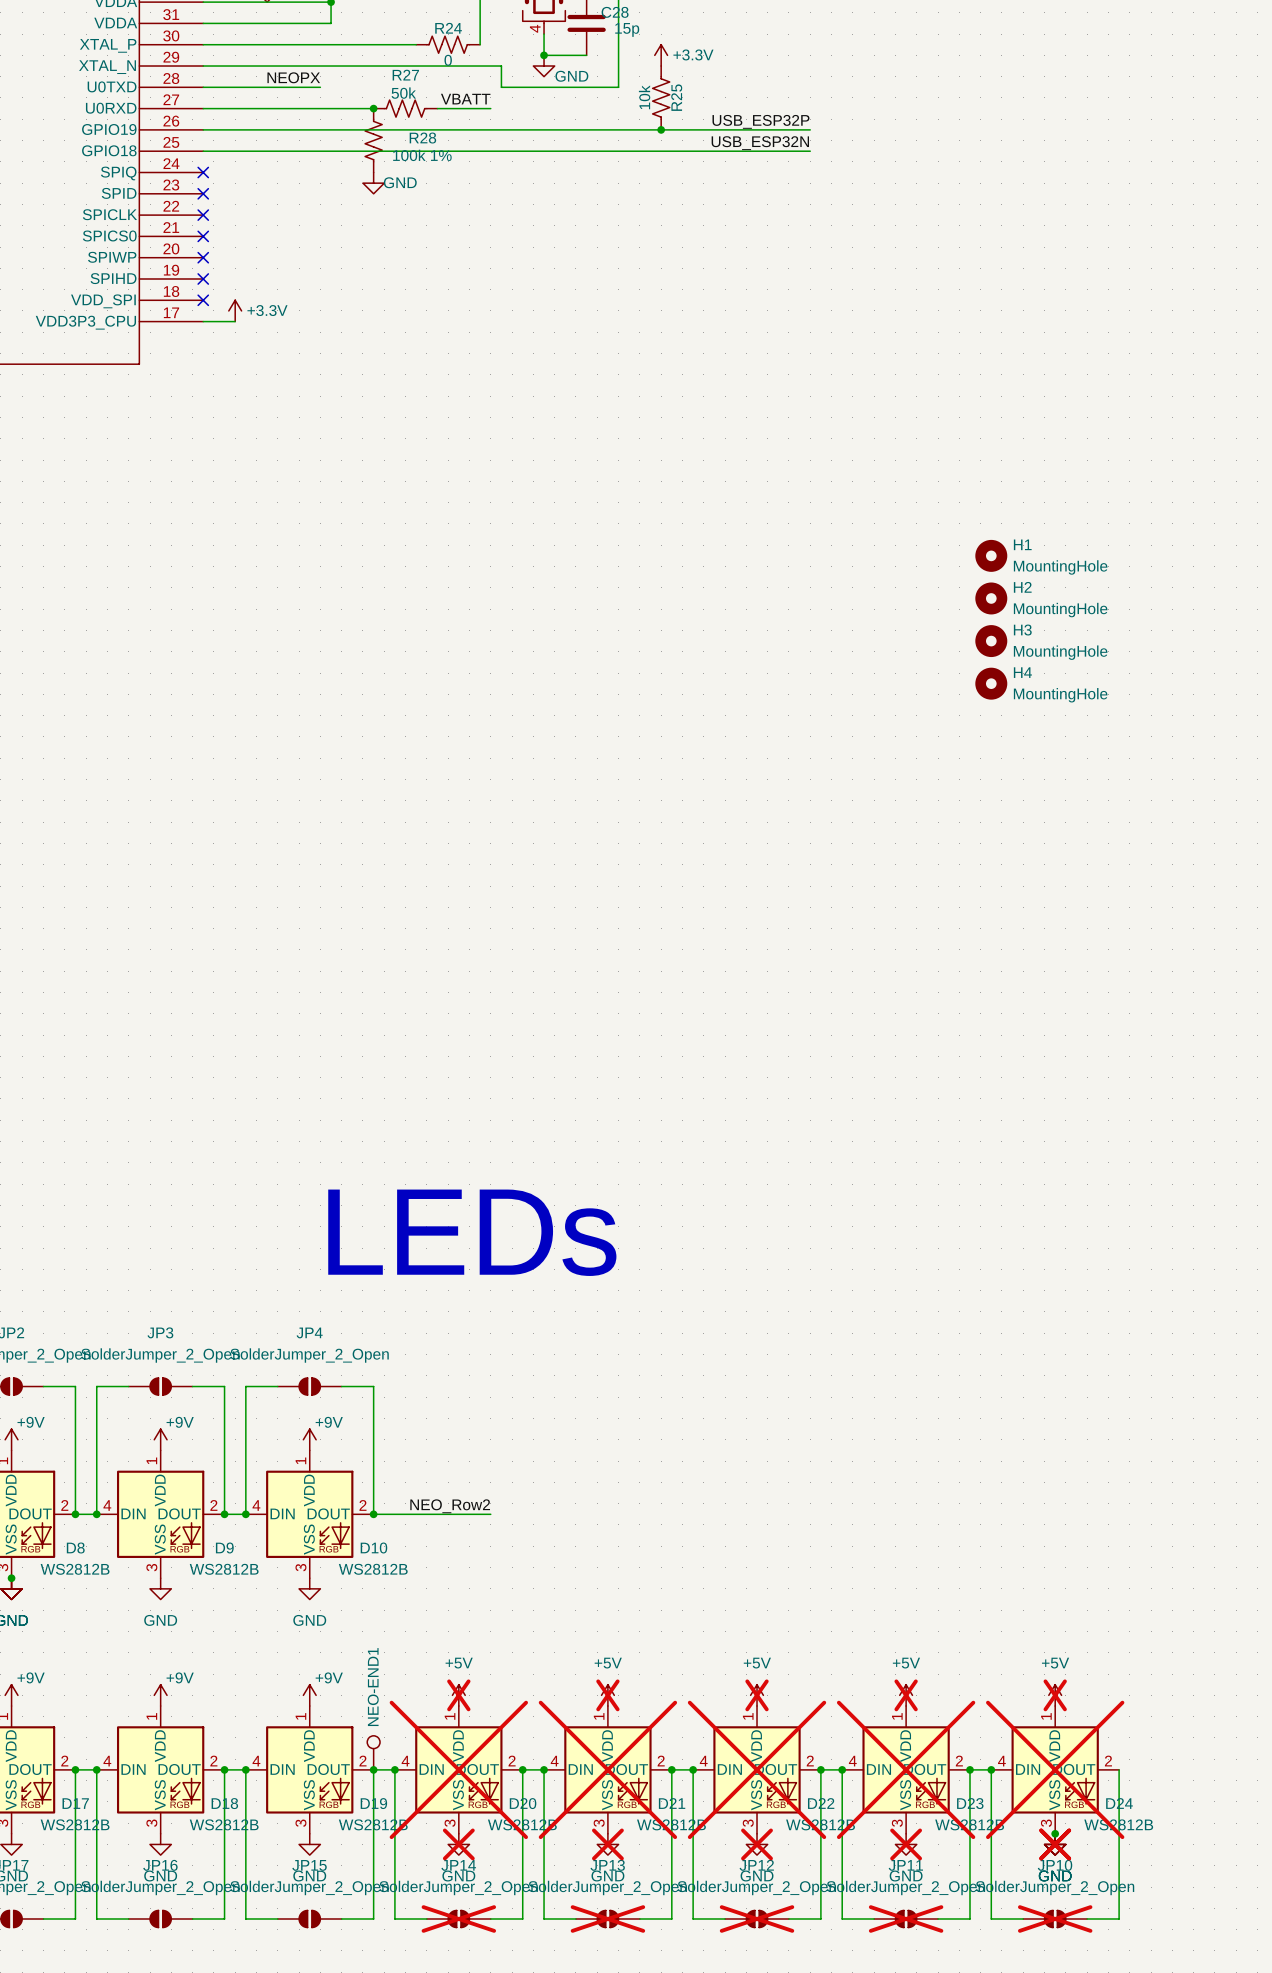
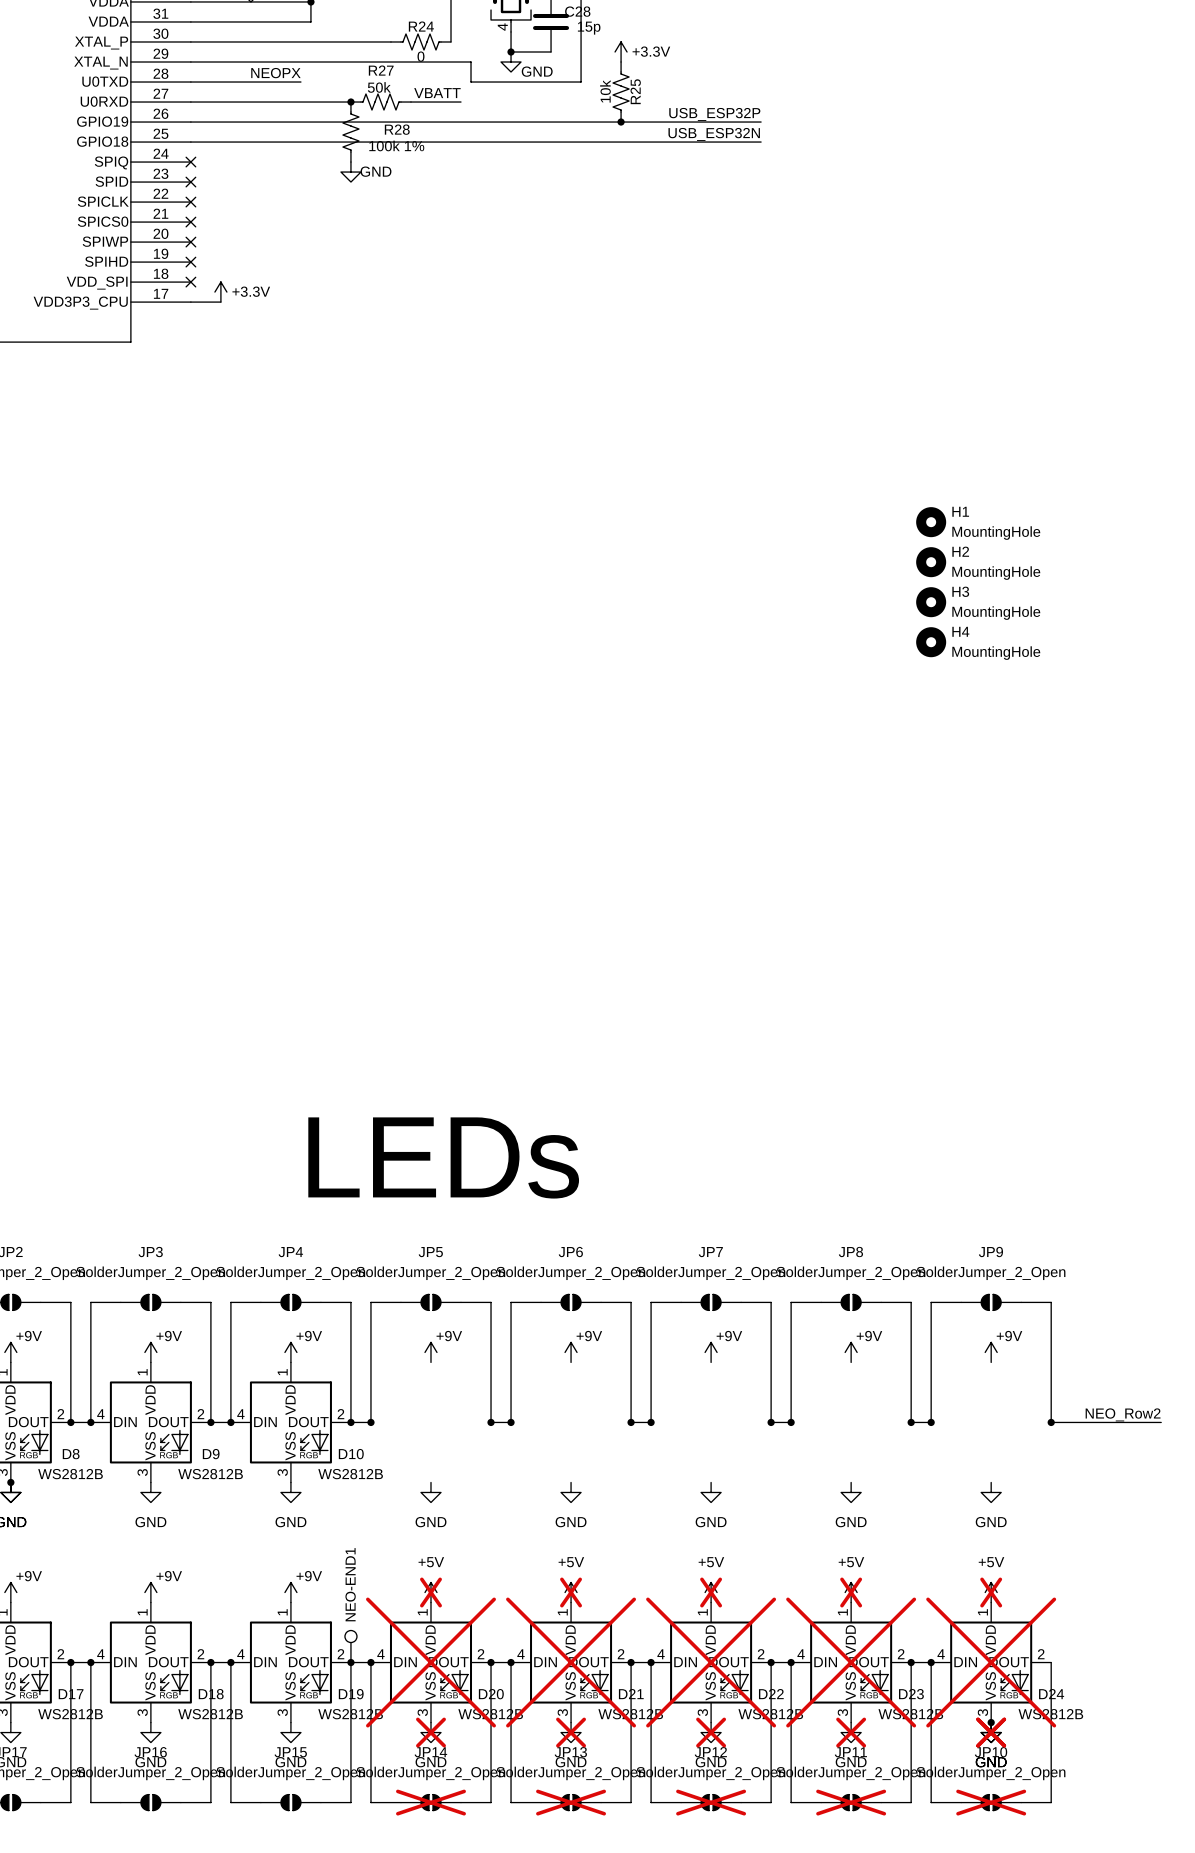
JP5: none -> SolderJumper_2_Open (430, 1302)
wire: none -> (461, 1302) (491, 1302) (491, 1422) (511, 1422) (511, 1302) (541, 1302)
JP6: none -> SolderJumper_2_Open (571, 1302)
wire: none -> (601, 1302) (631, 1302) (631, 1422) (651, 1422) (651, 1302) (681, 1302)
JP7: none -> SolderJumper_2_Open (711, 1302)
wire: none -> (741, 1302) (771, 1302) (771, 1422) (791, 1422) (791, 1302) (821, 1302)
JP8: none -> SolderJumper_2_Open (851, 1302)
wire: none -> (881, 1302) (911, 1302) (911, 1422) (931, 1422) (931, 1302) (961, 1302)
JP9: none -> SolderJumper_2_Open (991, 1302)
wire: none -> (1021, 1302) (1051, 1302) (1051, 1422) (1161, 1422)
power symbol: none -> +9V (430, 1352)
power symbol: none -> +9V (571, 1352)
power symbol: none -> +9V (711, 1352)
power symbol: none -> +9V (851, 1352)
power symbol: none -> +9V (991, 1352)
label: NEO_Row2 (450, 1506) -> none
label: none -> NEO_Row2 (1123, 1414)
wire: (394, 1514) (490, 1514) -> (370, 1422) (370, 1302) (400, 1302)
junction: none -> (370, 1422)
junction: none -> (491, 1422)
junction: none -> (511, 1422)
junction: none -> (631, 1422)
junction: none -> (651, 1422)
junction: none -> (771, 1422)
junction: none -> (791, 1422)
junction: none -> (911, 1422)
junction: none -> (931, 1422)
junction: none -> (1051, 1422)
power symbol: none -> GND (430, 1492)
power symbol: none -> GND (571, 1492)
power symbol: none -> GND (711, 1492)
power symbol: none -> GND (851, 1492)
power symbol: none -> GND (991, 1492)

